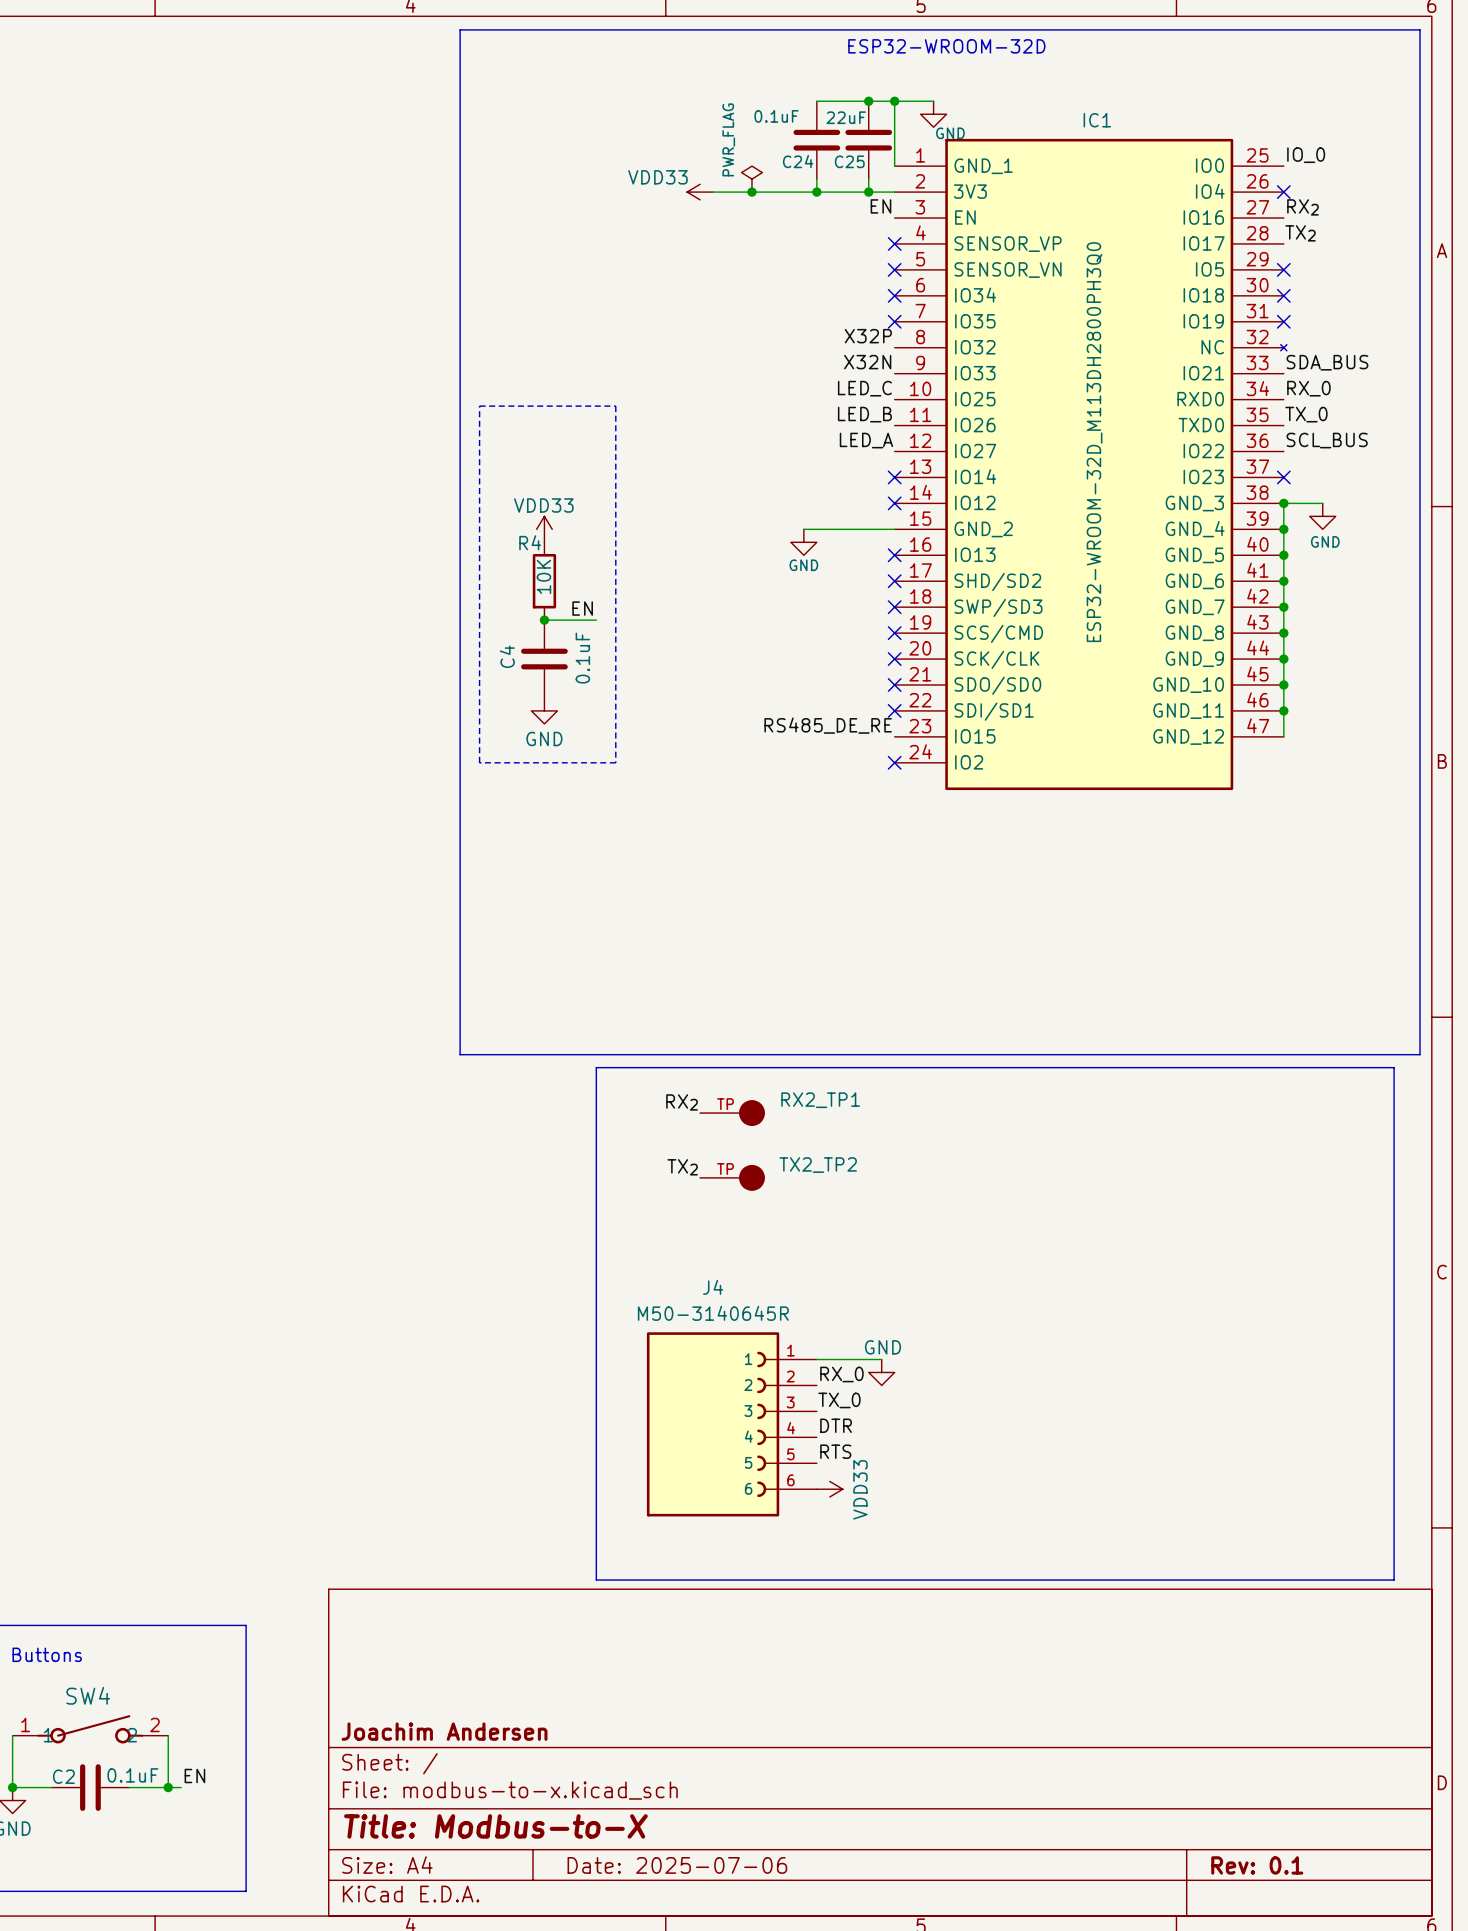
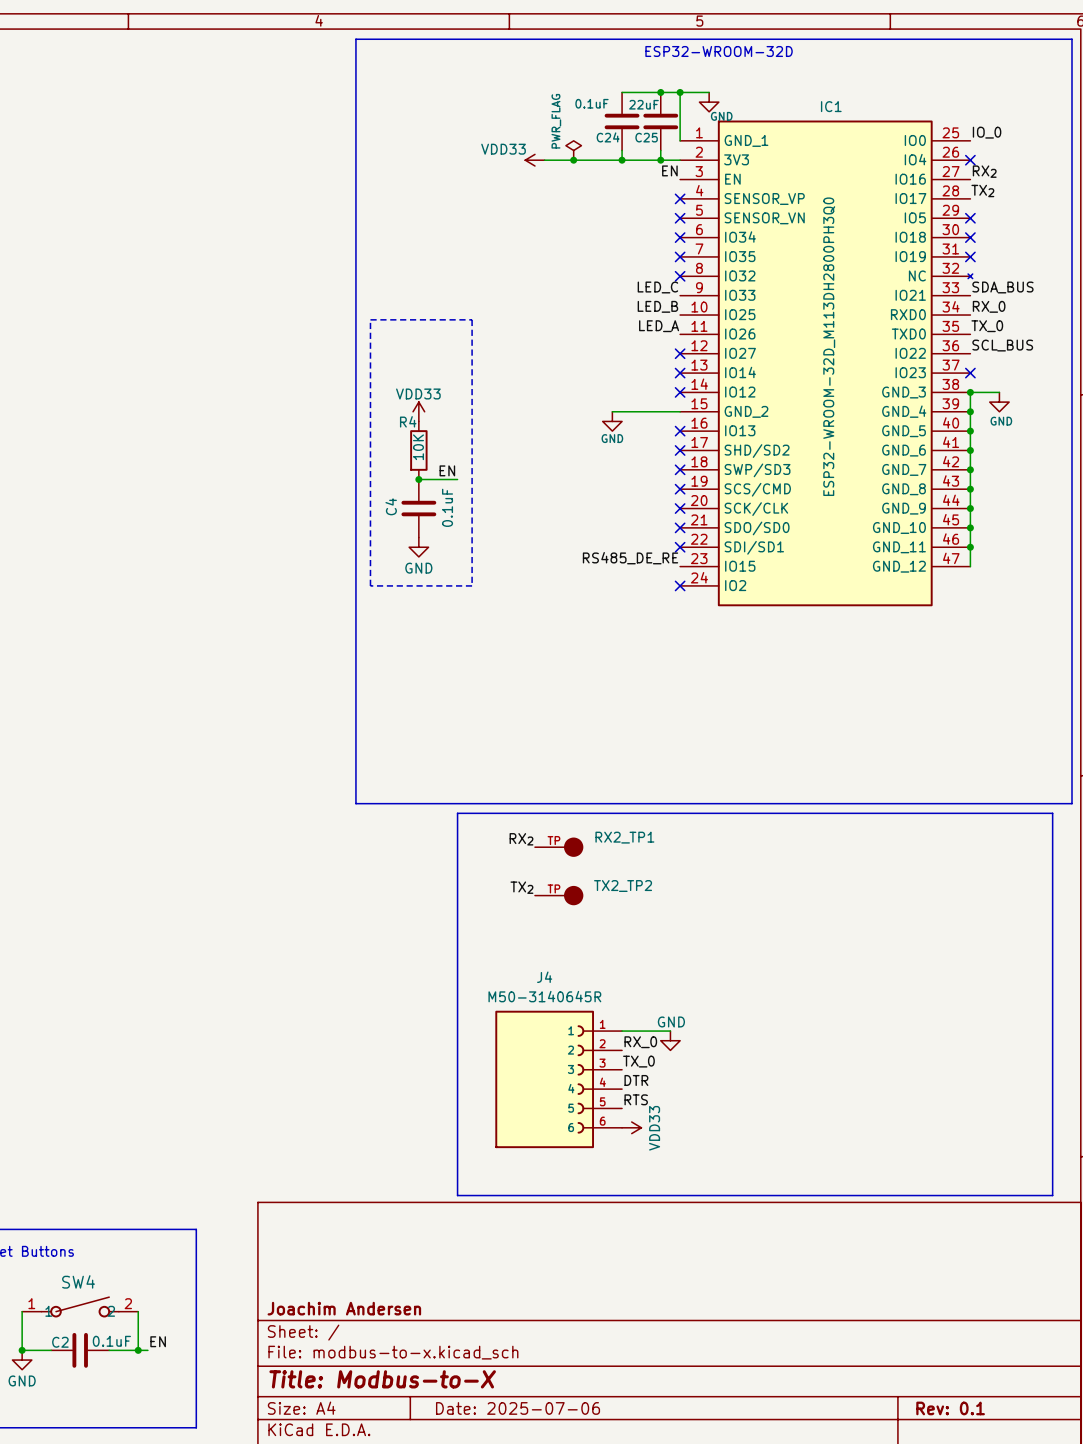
label: X32P (868, 336) -> none
no-connect mark: none -> (680, 276)
label: X32N (867, 362) -> LED_C (657, 287)
label: LED_C (864, 388) -> LED_B (657, 306)
label: LED_B (864, 414) -> LED_A (659, 326)
label: LED_A (866, 440) -> none
no-connect mark: none -> (680, 353)

